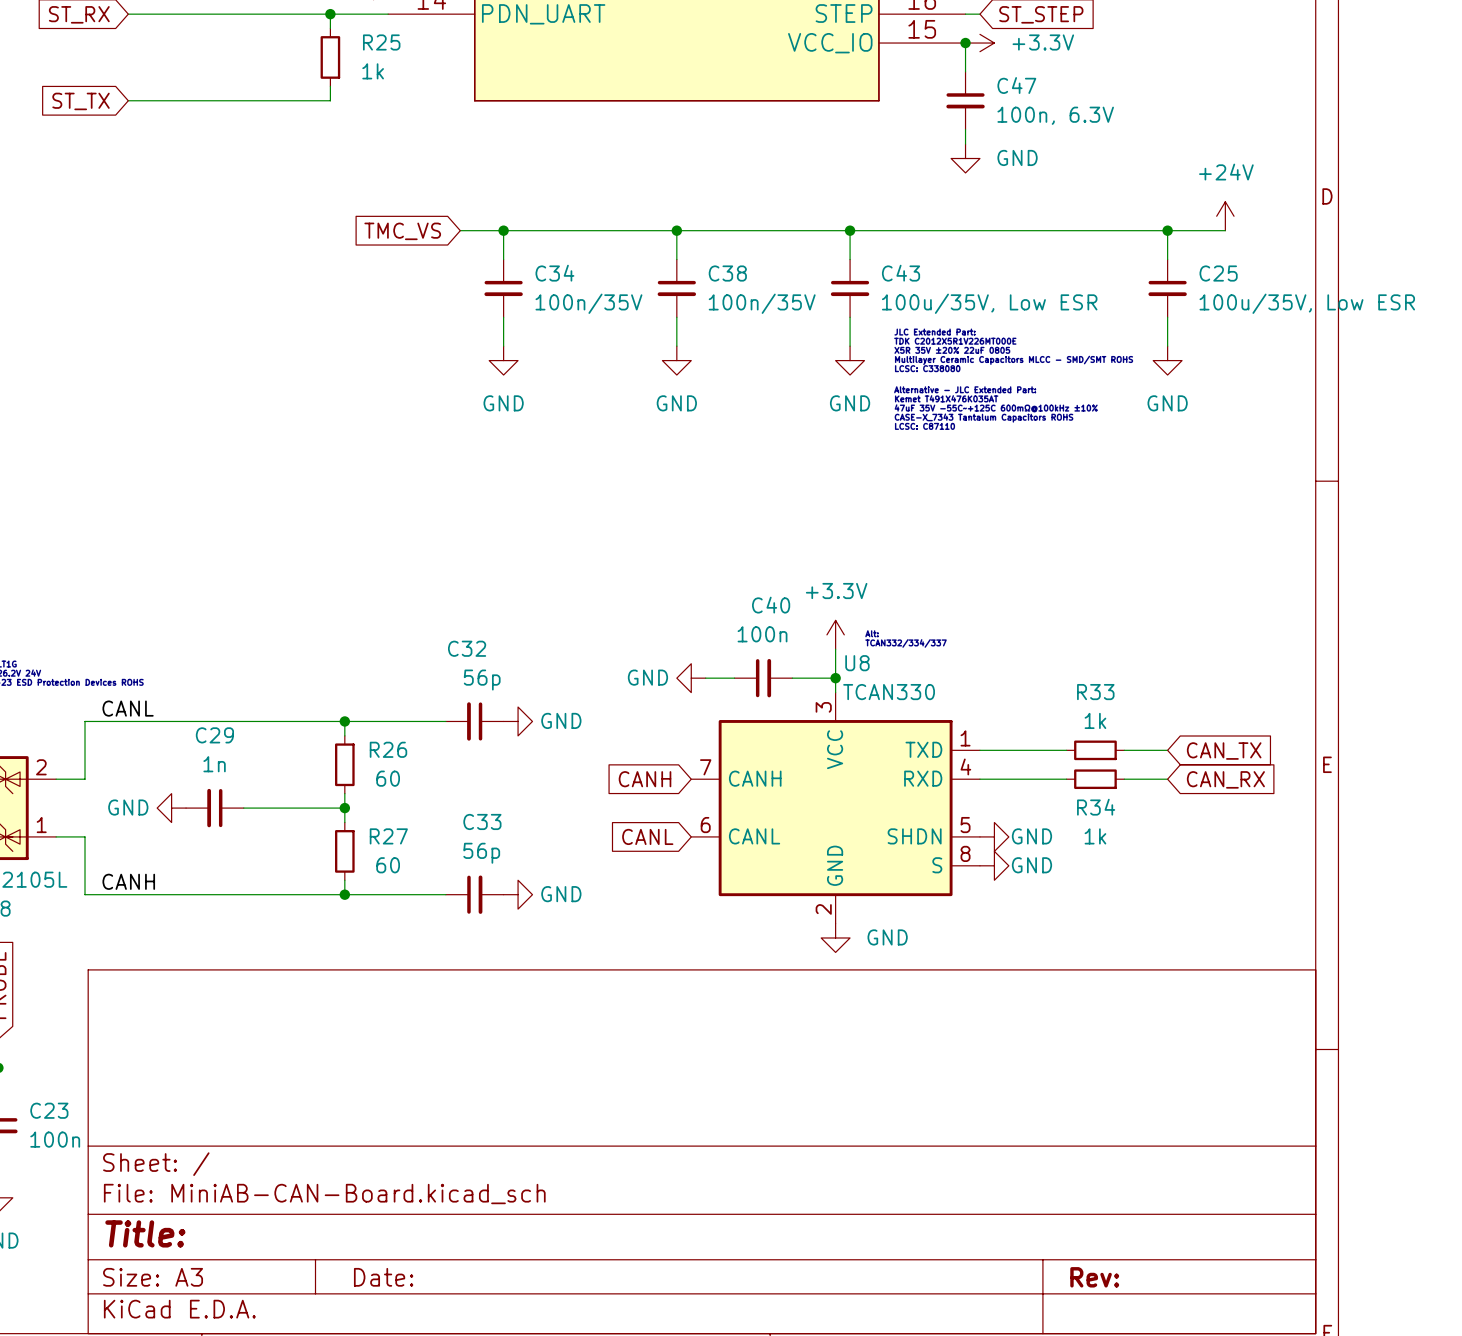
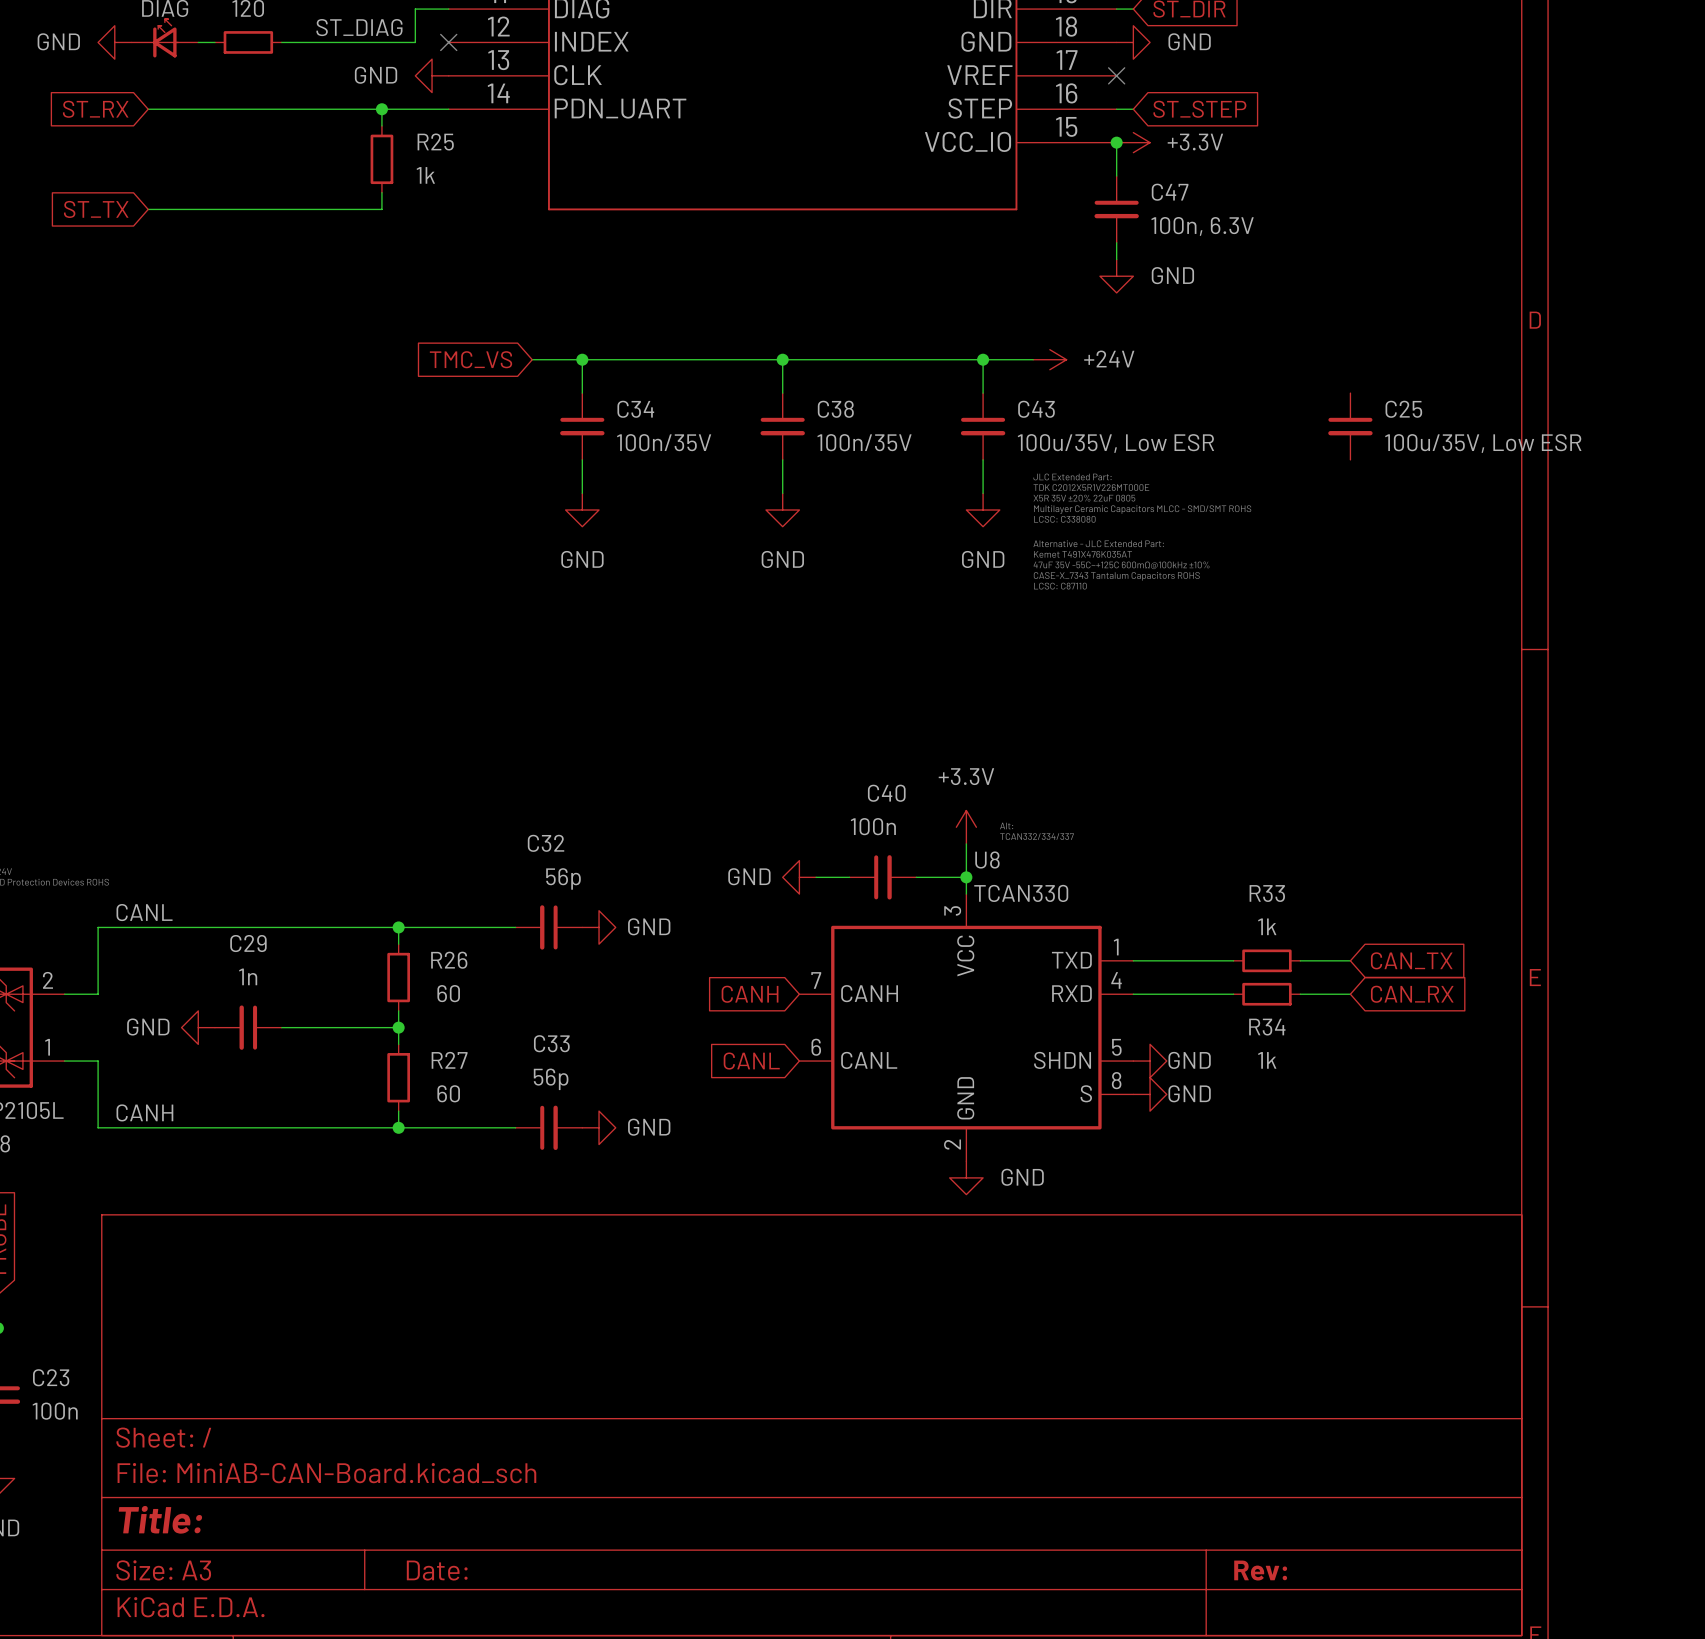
power symbol: +24V (1225, 216) -> none
wire: (893, 230) (1225, 230) -> none
power symbol: none -> +24V (1049, 359)
wire: (1167, 230) (1167, 259) -> none
junction: (1167, 230) -> none
wire: (1167, 317) (1167, 346) -> none
power symbol: GND (1167, 360) -> none

